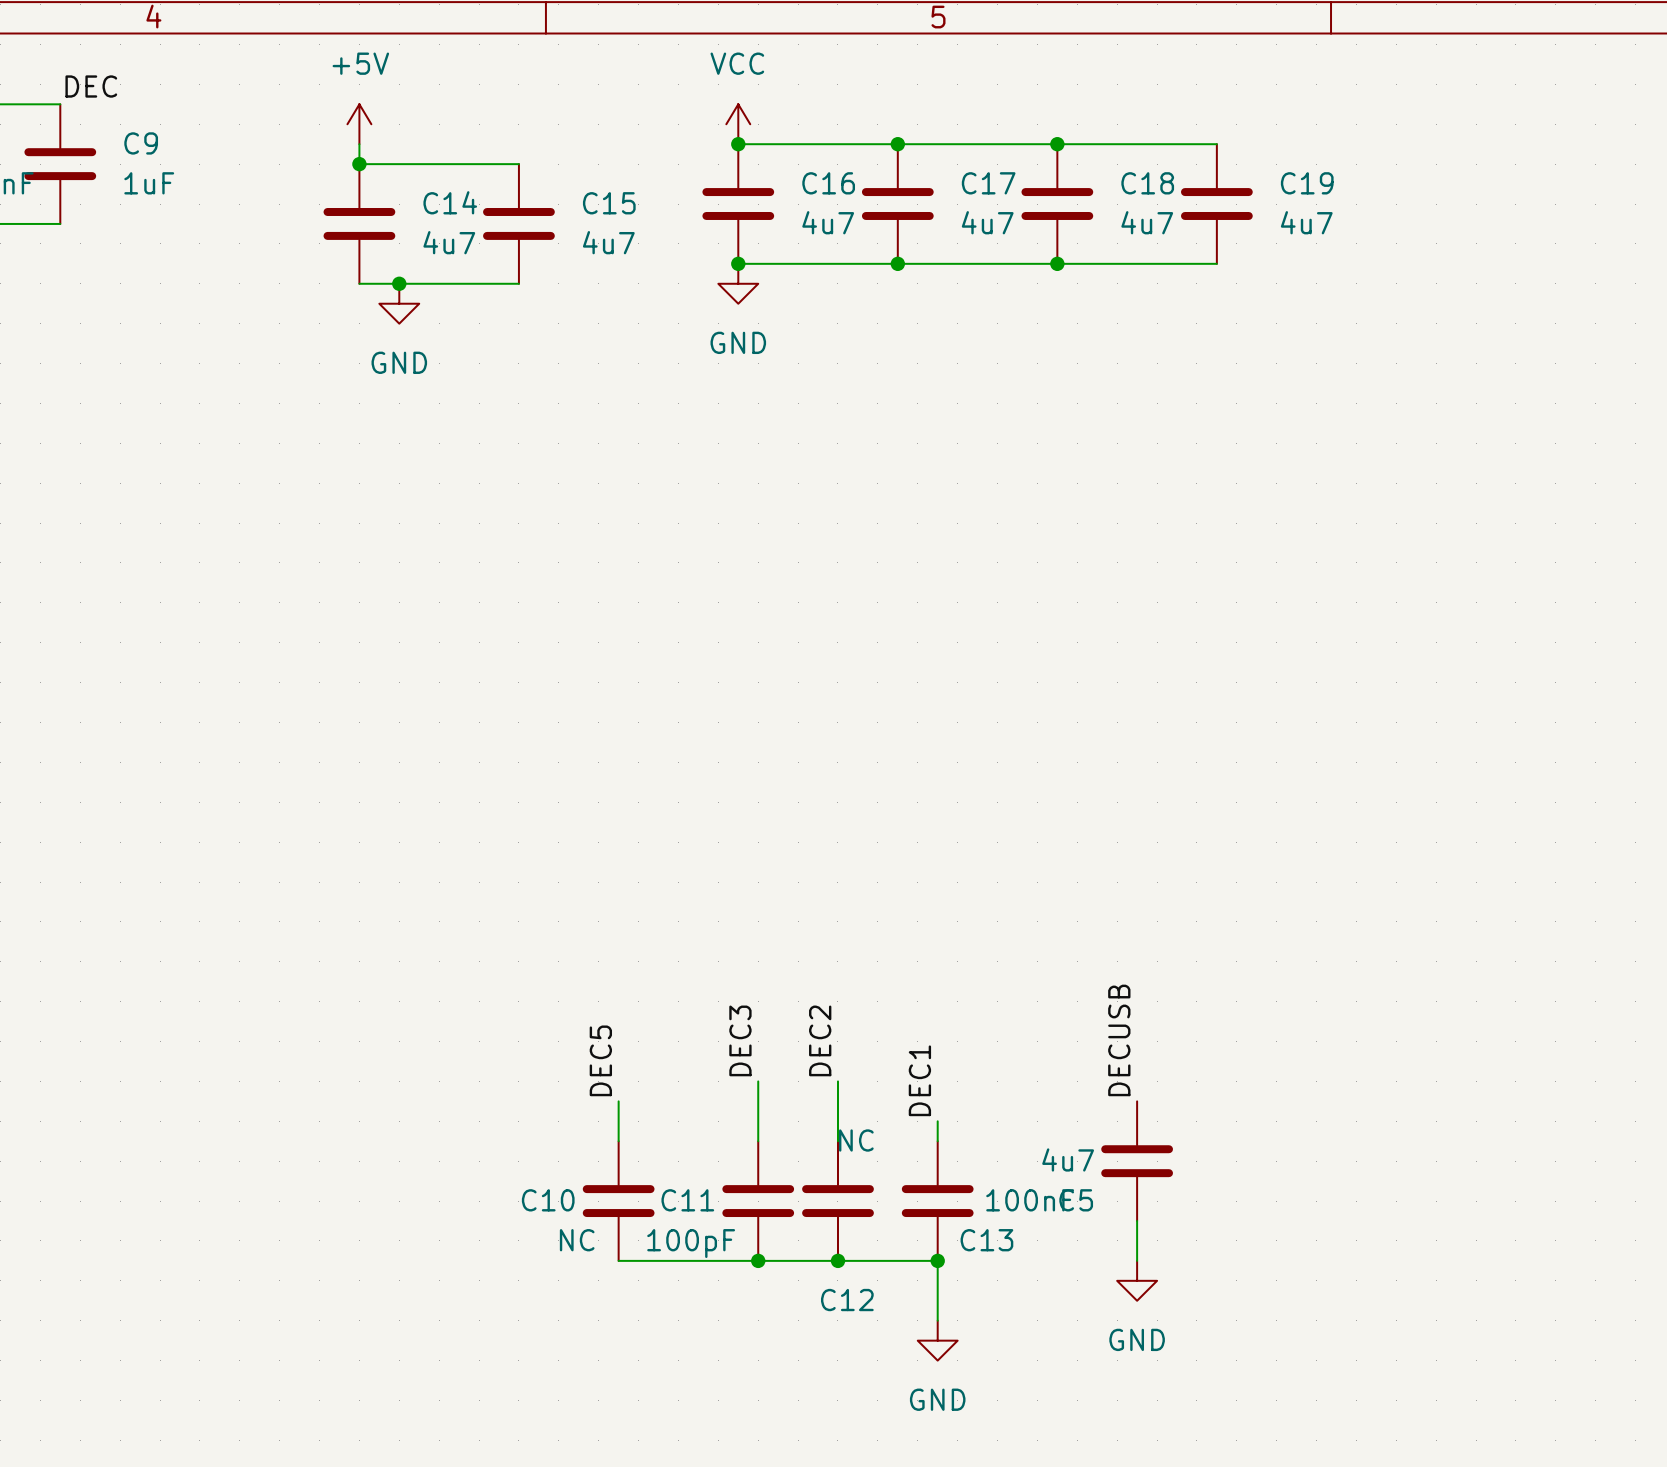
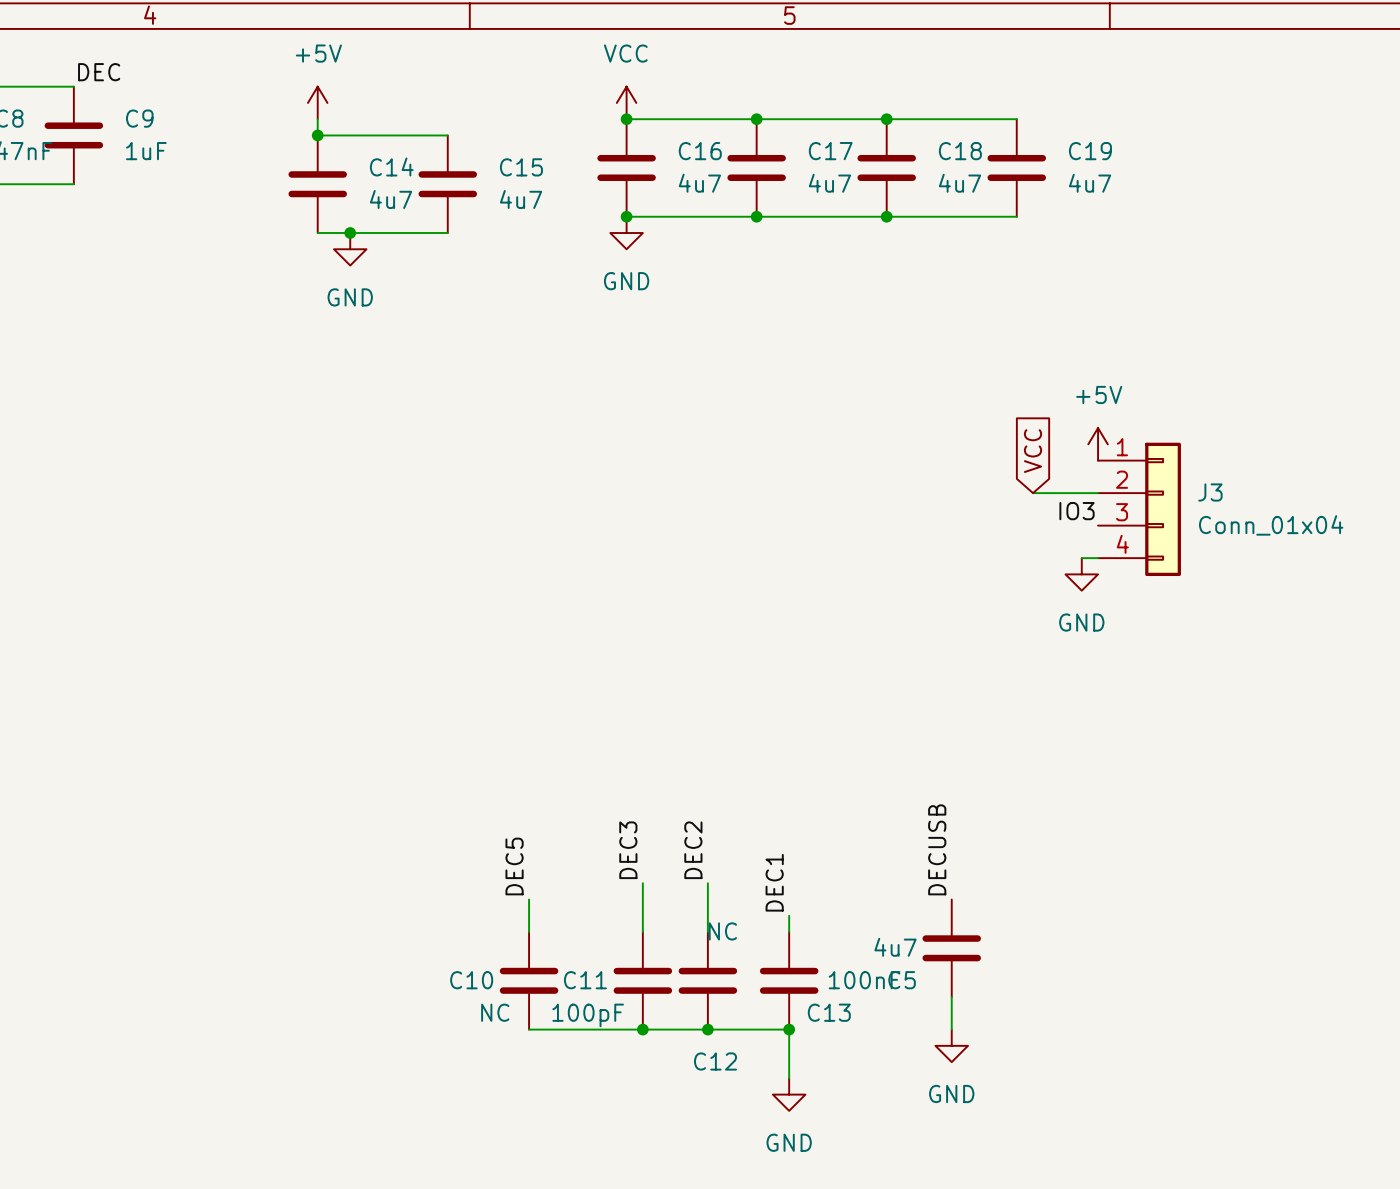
power symbol: none -> +5V (1098, 444)
global label: none -> VCC (1033, 451)
wire: none -> (1033, 493) (1098, 493)
J3: none -> Conn_01x04 (1139, 509)
label: none -> IO3 (1077, 511)
wire: none -> (1081, 558) (1098, 558)
power symbol: none -> GND (1081, 574)

